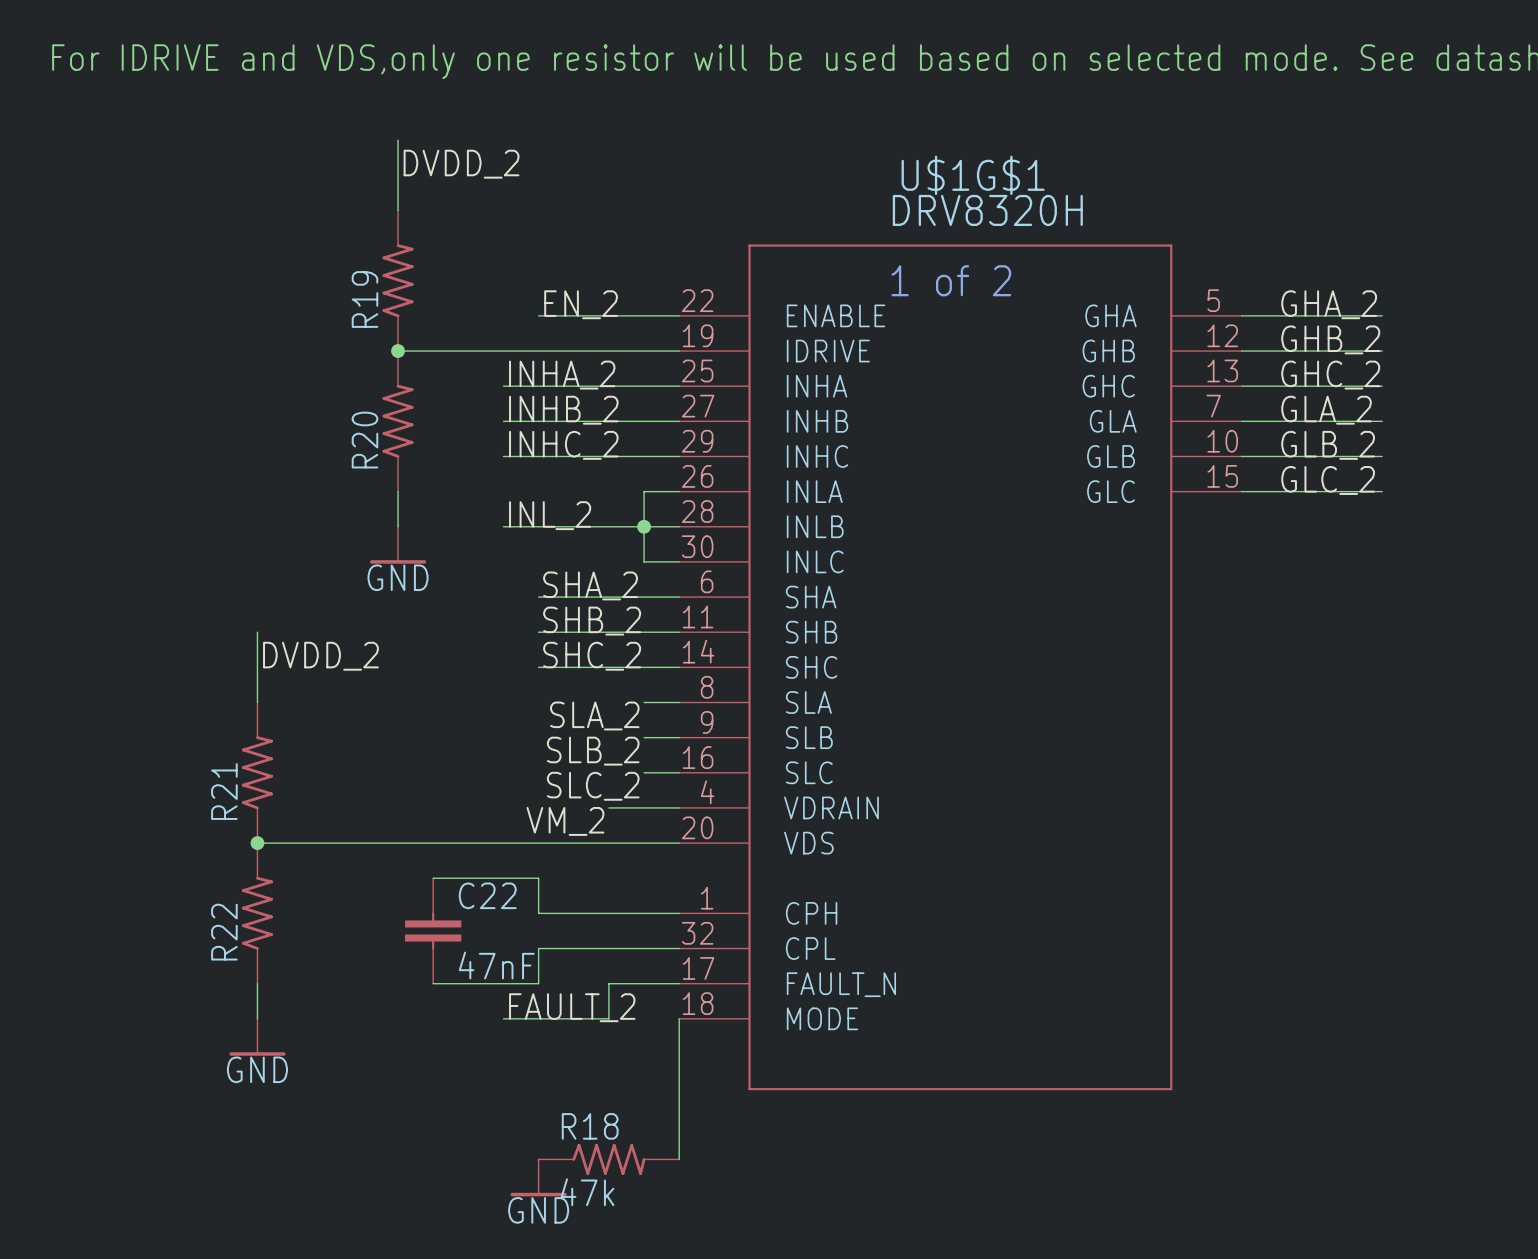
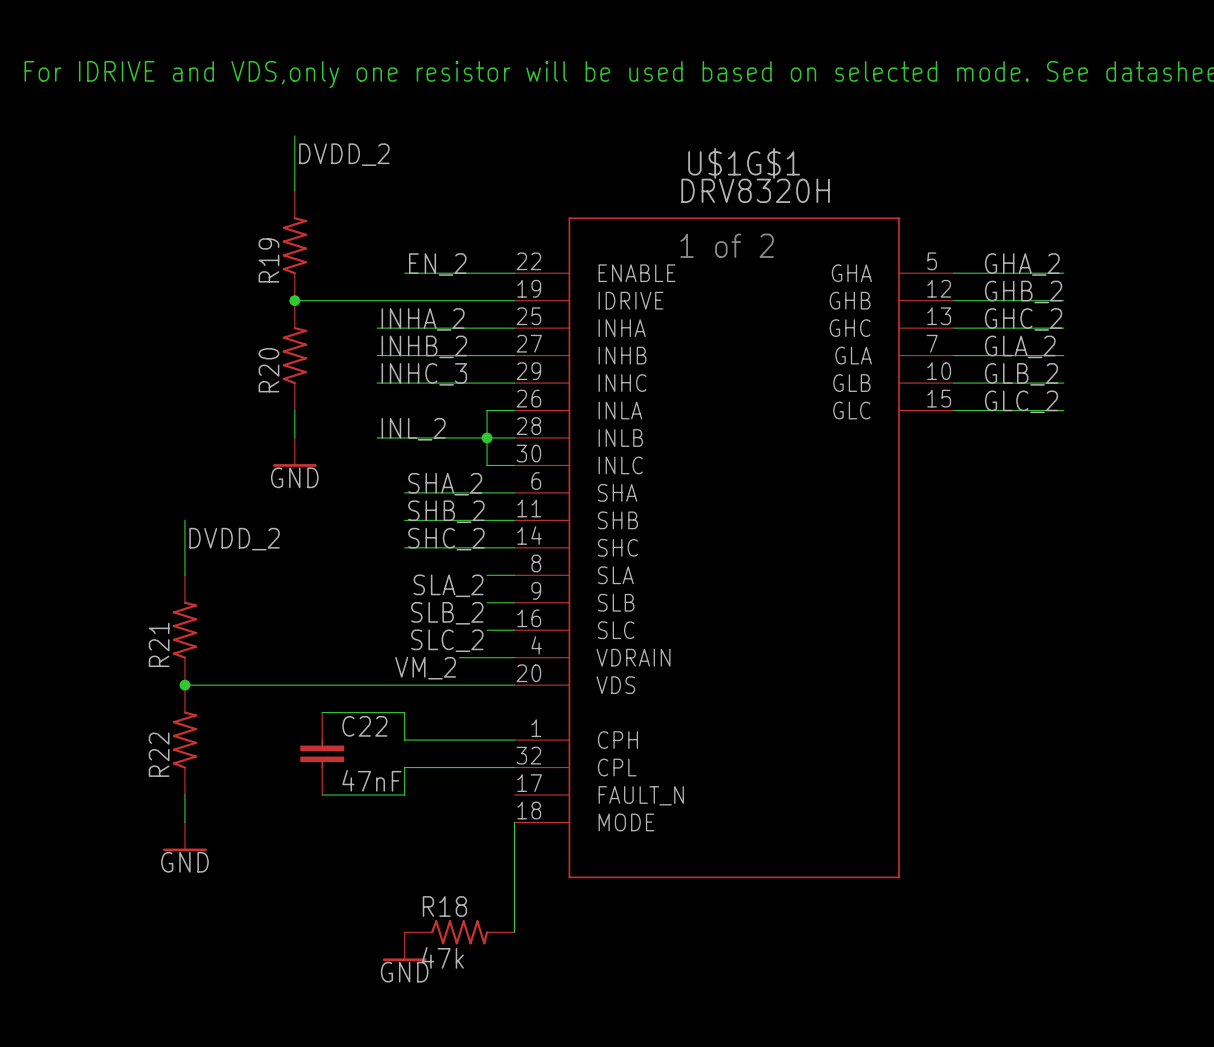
label: INHC_2 (563, 445) -> INHC_3 (424, 374)
wire: (679, 983) (608, 983) (608, 1018) (503, 1018) -> none
label: FAULT_2 (572, 1007) -> none

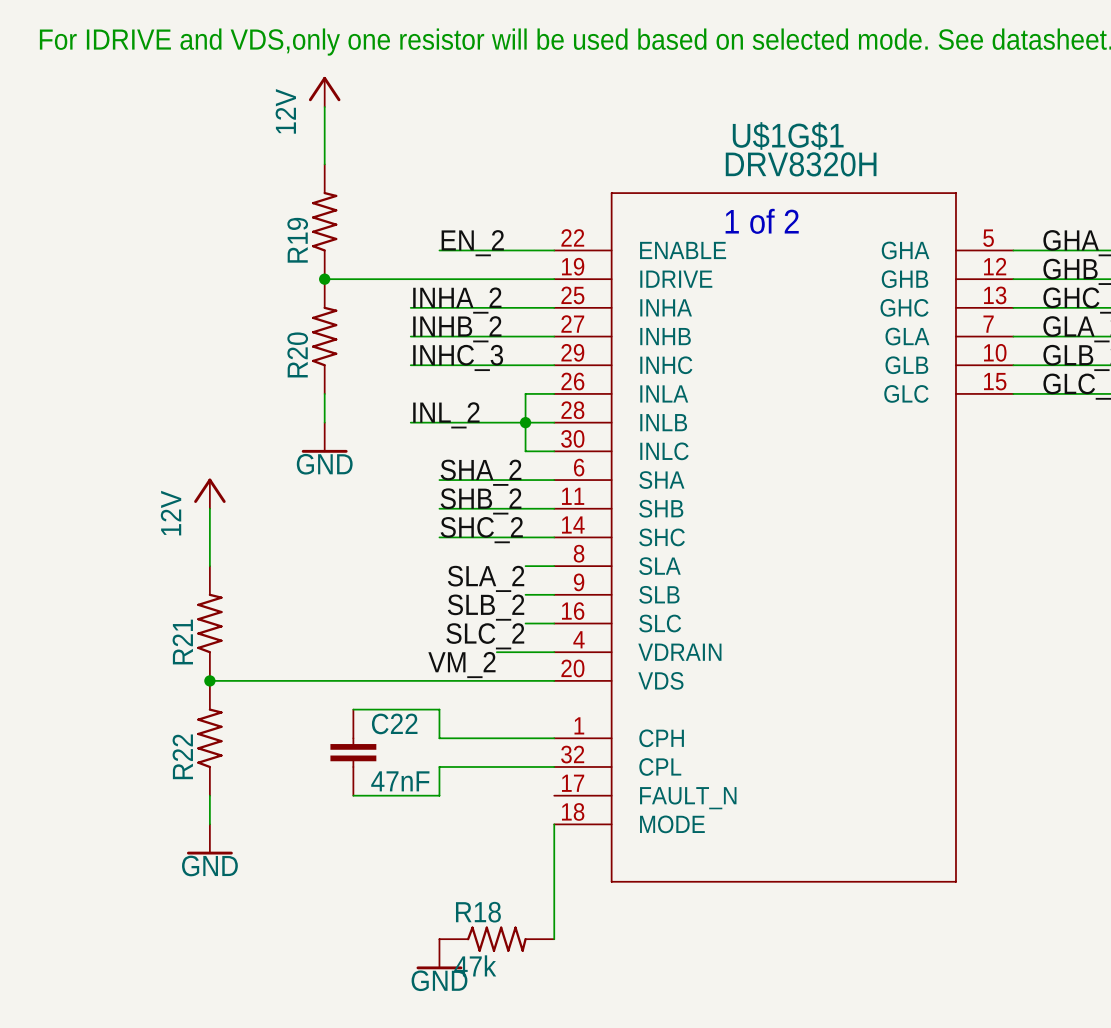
power symbol: none -> 12V (324, 91)
label: DVDD_2 (344, 154) -> none
power symbol: none -> 12V (209, 493)
label: DVDD_2 (234, 539) -> none

